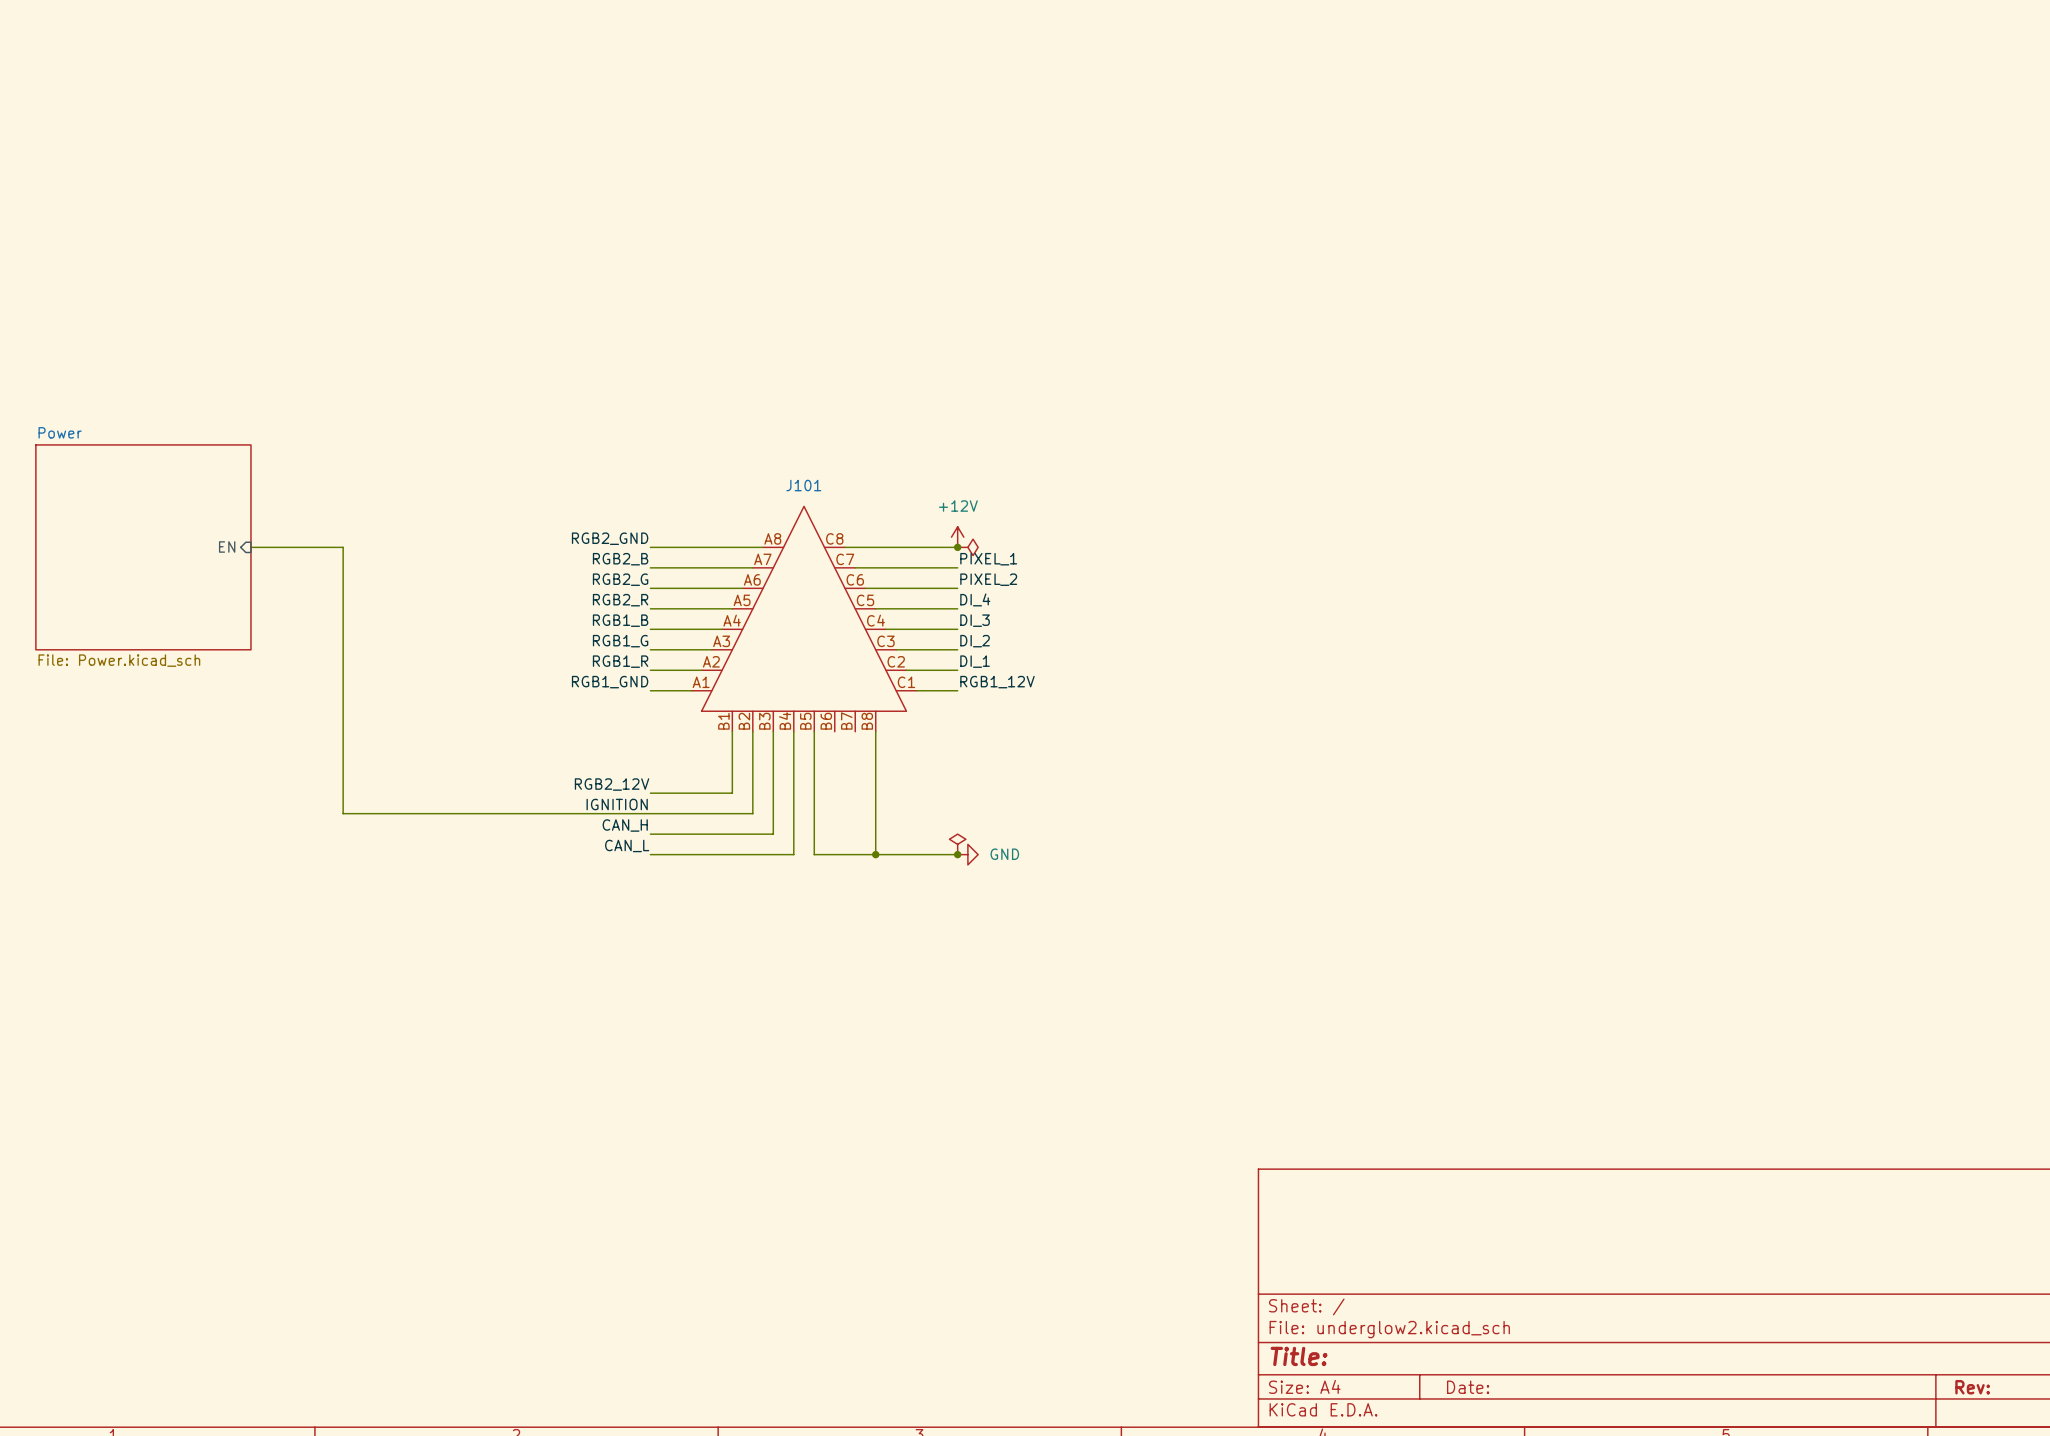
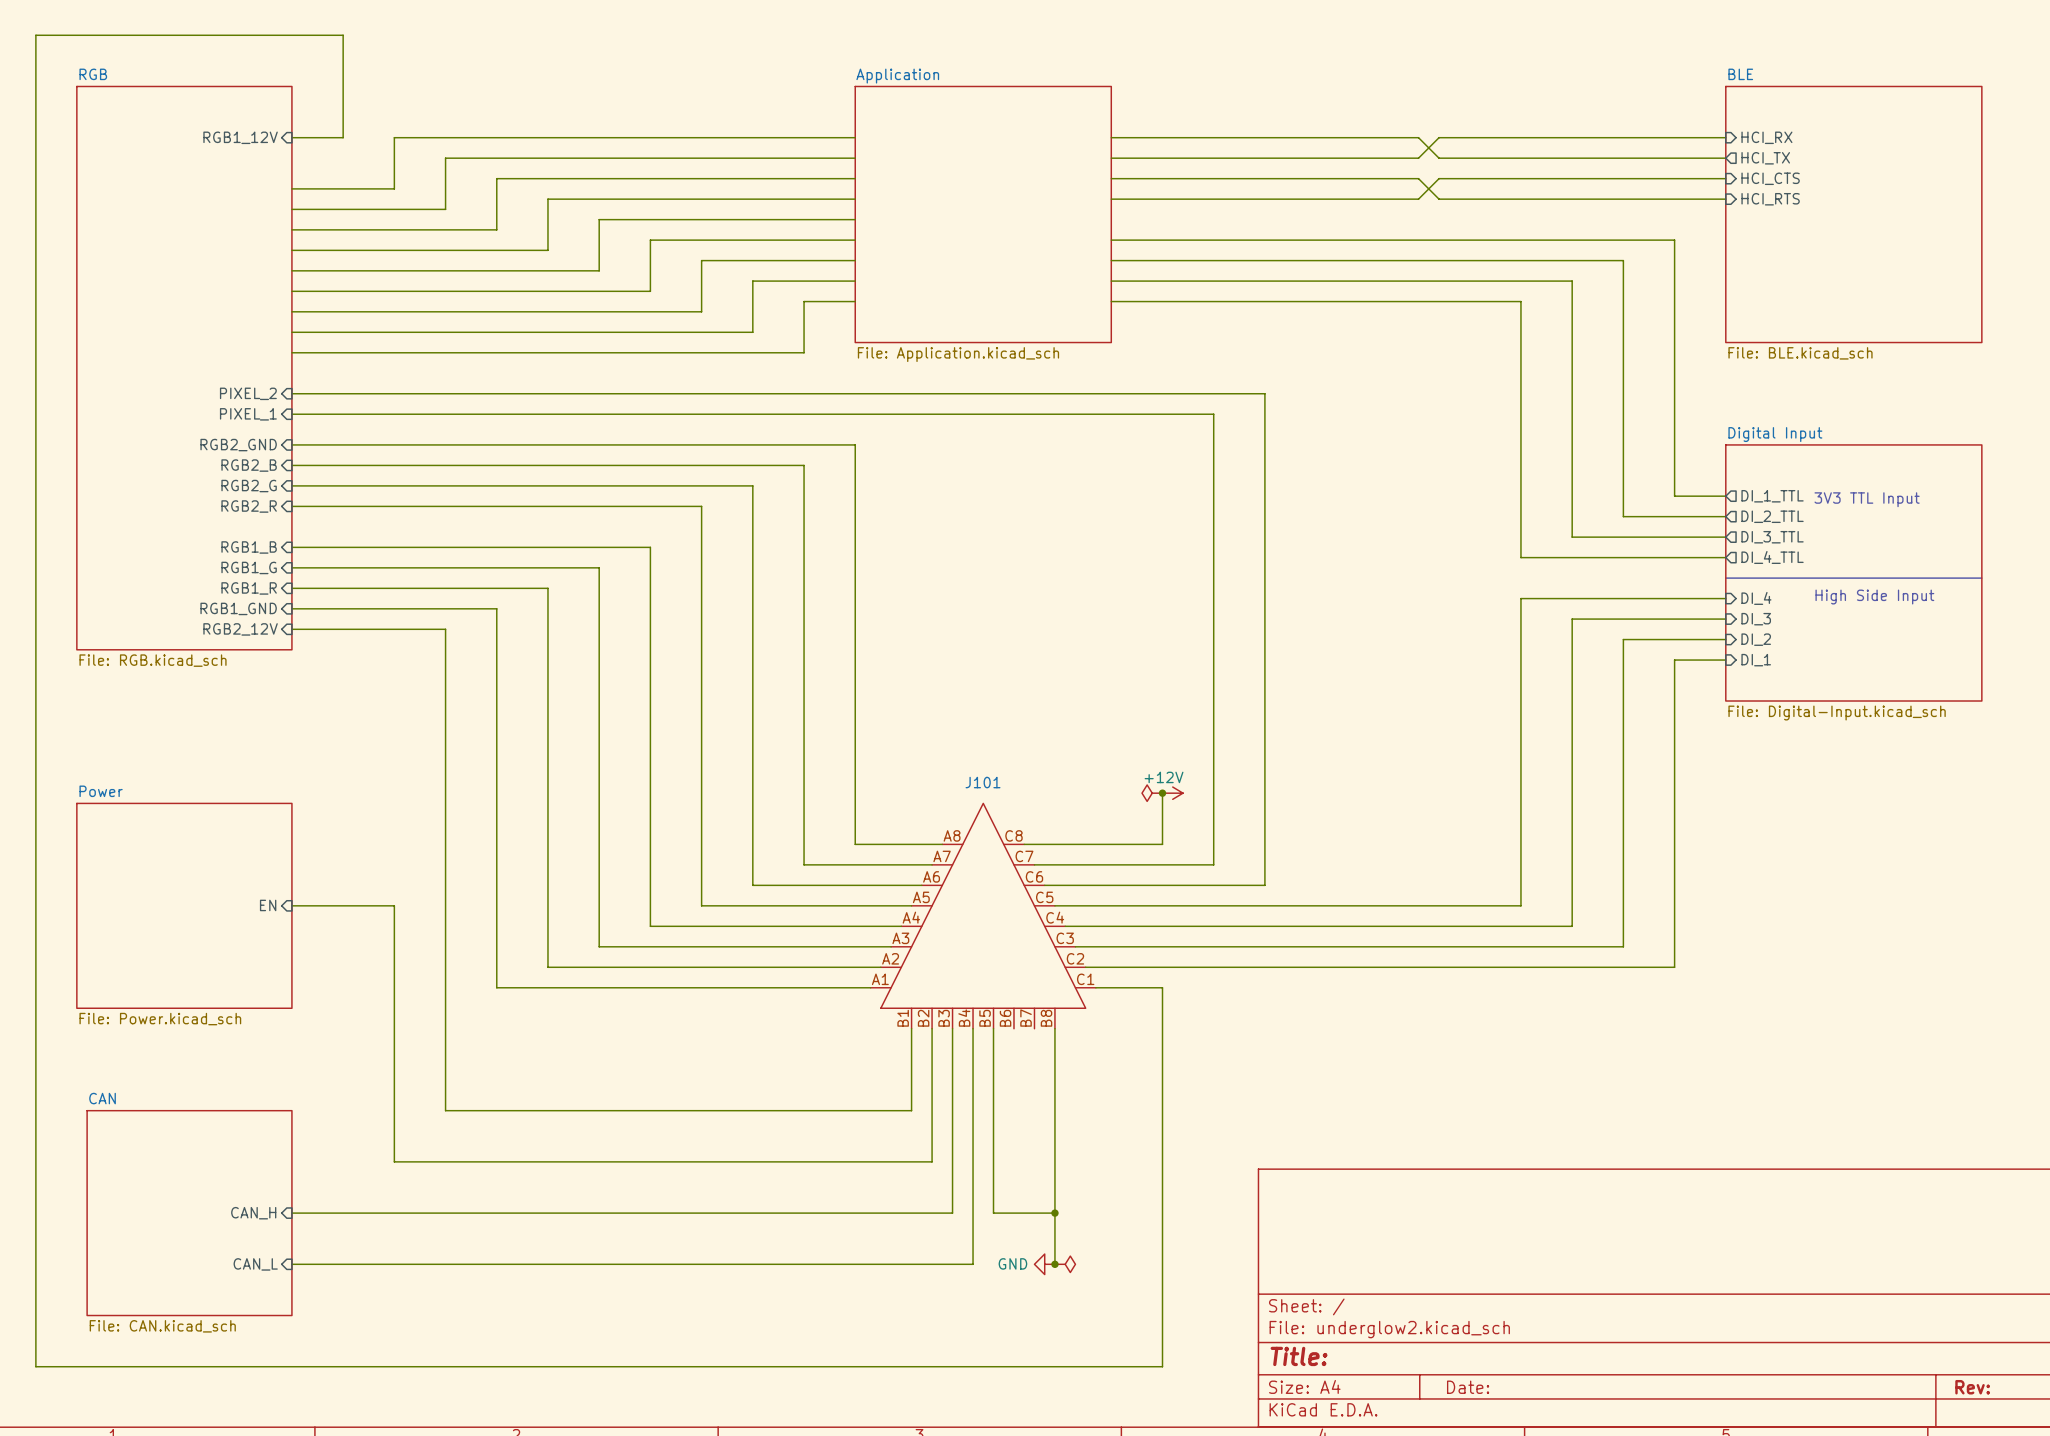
sheet pin: none -> RGB1_12V (240, 137)
wire: none -> (291, 137) (343, 137) (343, 35) (35, 35) (35, 1366) (1162, 1366) (1162, 987) (1095, 987)
wire: none -> (855, 137) (394, 137) (394, 188) (291, 188)
wire: none -> (1111, 137) (1418, 137) (1439, 158) (1725, 158)
wire: none -> (1725, 137) (1439, 137) (1418, 158) (1111, 158)
sheet pin: none -> HCI_RX (1766, 137)
wire: none -> (855, 158) (445, 158) (445, 209) (291, 209)
sheet pin: none -> HCI_TX (1765, 158)
wire: none -> (855, 178) (496, 178) (496, 229) (291, 229)
wire: none -> (1111, 178) (1418, 178) (1439, 199) (1725, 199)
wire: none -> (1725, 178) (1439, 178) (1418, 199) (1111, 199)
sheet pin: none -> HCI_CTS (1770, 178)
wire: none -> (855, 199) (547, 199) (547, 250) (291, 250)
sheet pin: none -> HCI_RTS (1770, 199)
sheet Application: none -> File: Application.kicad_sch (983, 214)
sheet BLE: none -> File: BLE.kicad_sch (1853, 214)
wire: none -> (855, 219) (599, 219) (599, 270) (291, 270)
wire: none -> (855, 240) (650, 240) (650, 291) (291, 291)
wire: none -> (1111, 240) (1674, 240) (1674, 496) (1725, 496)
wire: none -> (855, 260) (701, 260) (701, 311) (291, 311)
wire: none -> (1111, 260) (1623, 260) (1623, 516) (1725, 516)
wire: none -> (855, 281) (752, 281) (752, 332) (291, 332)
wire: none -> (1111, 281) (1572, 281) (1572, 537) (1725, 537)
wire: none -> (855, 301) (804, 301) (804, 352) (291, 352)
wire: none -> (1111, 301) (1520, 301) (1520, 557) (1725, 557)
sheet RGB: none -> File: RGB.kicad_sch (184, 368)
sheet pin: none -> PIXEL_2 (248, 393)
wire: none -> (291, 393) (1264, 393) (1264, 885) (1044, 885)
sheet pin: none -> PIXEL_1 (248, 414)
wire: none -> (291, 414) (1213, 414) (1213, 864) (1034, 864)
wire: none -> (291, 444) (855, 444) (855, 844) (942, 844)
sheet pin: none -> RGB2_GND (238, 445)
sheet pin: none -> RGB2_B (249, 465)
wire: none -> (291, 465) (804, 465) (804, 864) (932, 864)
wire: none -> (291, 485) (752, 485) (752, 731)
sheet pin: none -> RGB2_G (249, 486)
sheet pin: none -> DI_1_TTL (1772, 496)
text: none -> 3V3 TTL Input (1867, 499)
sheet pin: none -> RGB2_R (249, 506)
wire: none -> (291, 506) (701, 506) (701, 905) (911, 905)
sheet pin: none -> DI_2_TTL (1772, 516)
power symbol: +12V (957, 537) -> none
sheet pin: none -> DI_3_TTL (1772, 537)
label: RGB2_GND (610, 538) -> none
sheet pin: EN (227, 546) -> none
sheet Power: File: Power.kicad_sch (143, 547) -> none
sheet pin: none -> RGB1_B (249, 547)
wire: (250, 547) (291, 547) -> none
wire: (343, 547) (343, 813) (752, 813) -> (343, 547) (650, 547) (650, 926) (901, 926)
wire: (650, 547) (763, 547) -> none
wire: (845, 547) (957, 547) -> none
junction: (957, 547) -> none
power symbol: (967, 547) -> none
sheet pin: none -> DI_4_TTL (1772, 557)
label: RGB2_B (620, 559) -> none
label: PIXEL_1 (988, 559) -> none
sheet pin: none -> RGB1_G (249, 567)
wire: none -> (291, 567) (599, 567) (599, 946) (891, 946)
wire: (650, 567) (752, 567) -> none
wire: (855, 567) (957, 567) -> none
sheet Digital Input: none -> File: Digital-Input.kicad_sch (1853, 572)
line: none -> (1725, 578) (1981, 578)
label: RGB2_G (620, 579) -> none
label: PIXEL_2 (988, 579) -> none
sheet pin: none -> RGB1_R (249, 588)
wire: none -> (291, 588) (547, 588) (547, 967) (880, 967)
wire: (650, 588) (742, 588) -> none
wire: (865, 588) (957, 588) -> none
text: none -> High Side Input (1874, 597)
wire: none -> (1725, 598) (1520, 598) (1520, 905) (1054, 905)
sheet pin: none -> DI_4 (1756, 598)
label: DI_4 (975, 599) -> none
label: RGB2_R (620, 600) -> none
sheet pin: none -> RGB1_GND (238, 608)
wire: none -> (291, 608) (496, 608) (496, 987) (870, 987)
wire: (650, 608) (732, 608) -> none
wire: (875, 608) (957, 608) -> none
J101 position: (804, 619) -> (983, 916)
wire: none -> (1725, 619) (1572, 619) (1572, 926) (1065, 926)
sheet pin: none -> DI_3 (1756, 619)
label: RGB1_B (620, 620) -> none
label: DI_3 (975, 620) -> none
sheet pin: none -> RGB2_12V (240, 629)
wire: none -> (291, 629) (445, 629) (445, 1110) (911, 1110) (911, 1028)
wire: (650, 629) (722, 629) -> none
wire: (885, 629) (957, 629) -> none
wire: none -> (1725, 639) (1623, 639) (1623, 946) (1075, 946)
sheet pin: none -> DI_2 (1756, 639)
label: RGB1_G (620, 641) -> none
label: DI_2 (975, 641) -> none
wire: (650, 649) (711, 649) -> none
wire: (896, 649) (957, 649) -> none
wire: none -> (1725, 660) (1674, 660) (1674, 967) (1085, 967)
sheet pin: none -> DI_1 (1756, 660)
label: RGB1_R (620, 661) -> none
label: DI_1 (975, 661) -> none
wire: (650, 670) (701, 670) -> none
wire: (906, 670) (957, 670) -> none
label: RGB1_GND (610, 682) -> none
label: RGB1_12V (997, 682) -> none
wire: (650, 690) (691, 690) -> none
wire: (916, 690) (957, 690) -> none
wire: (732, 731) (732, 793) (650, 793) -> none
wire: (773, 731) (773, 834) (650, 834) -> none
wire: (793, 731) (793, 854) (650, 854) -> none
wire: (814, 731) (814, 854) (957, 854) -> none
wire: (875, 731) (875, 854) -> none
label: RGB2_12V (612, 784) -> none
power symbol: none -> (1152, 793)
wire: none -> (1162, 793) (1162, 844) (1024, 844)
junction: none -> (1162, 793)
power symbol: none -> +12V (1172, 793)
label: IGNITION (617, 804) -> none
wire: none -> (752, 813) (752, 885) (921, 885)
label: CAN_H (625, 825) -> none
power symbol: (957, 844) -> none
label: CAN_L (627, 845) -> none
junction: (875, 854) -> none
junction: (957, 854) -> none
power symbol: GND (967, 854) -> none
sheet Power: none -> File: Power.kicad_sch (184, 905)
sheet pin: none -> EN (268, 905)
wire: none -> (291, 905) (394, 905) (394, 1161) (932, 1161) (932, 1028)
wire: none -> (952, 1028) (952, 1213) (291, 1213)
wire: none -> (973, 1028) (973, 1264) (291, 1264)
wire: none -> (993, 1028) (993, 1213) (1054, 1213)
wire: none -> (1054, 1028) (1054, 1264)
sheet CAN: none -> File: CAN.kicad_sch (189, 1213)
sheet pin: none -> CAN_H (253, 1213)
junction: none -> (1054, 1213)
sheet pin: none -> CAN_L (255, 1264)
power symbol: none -> GND (1044, 1264)
junction: none -> (1054, 1264)
power symbol: none -> (1065, 1264)

